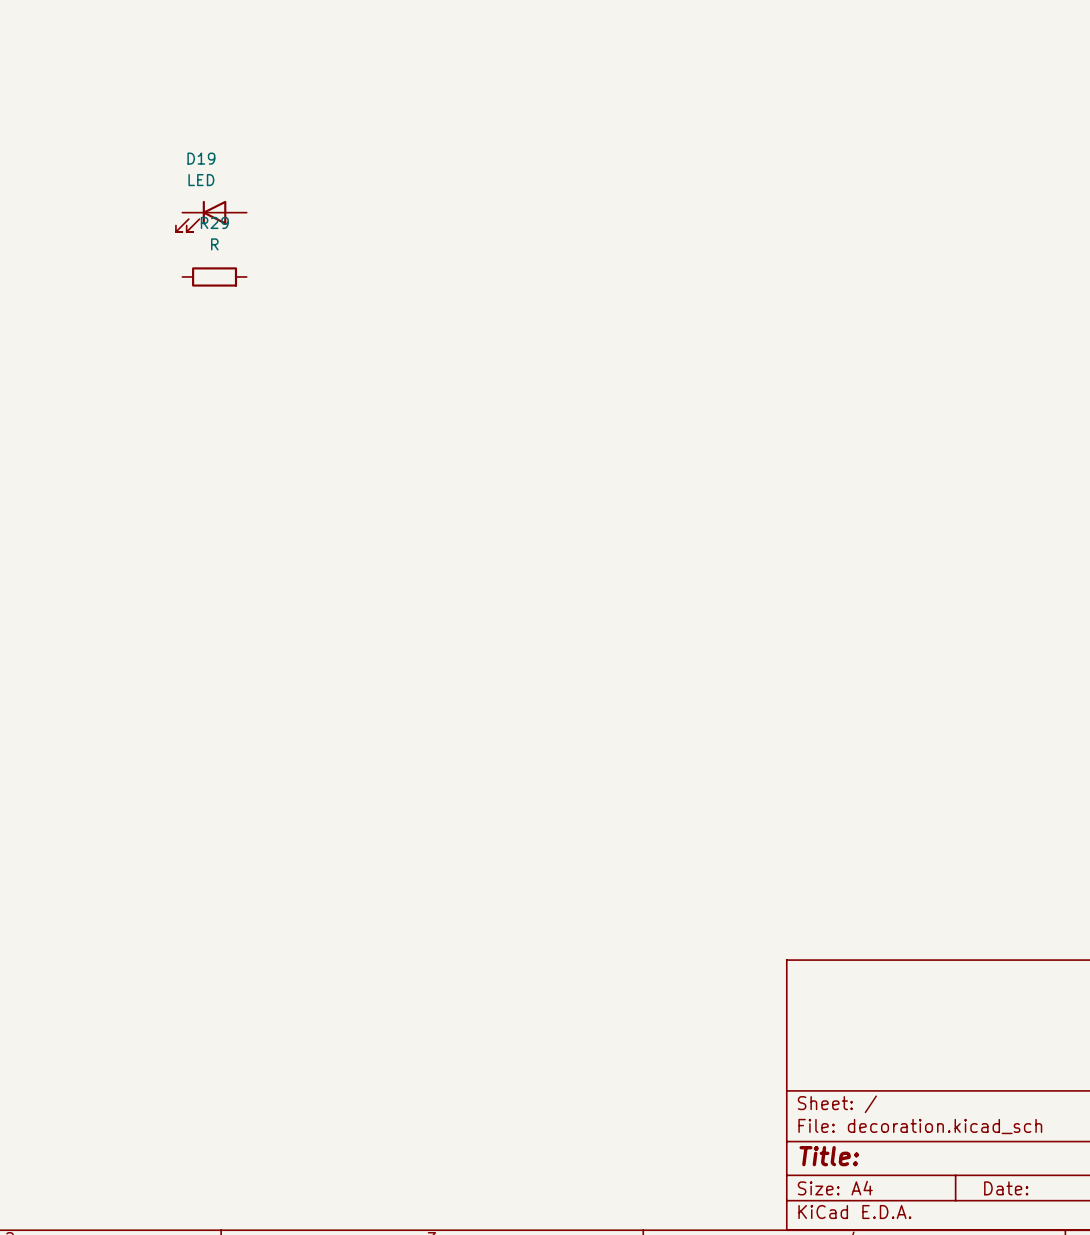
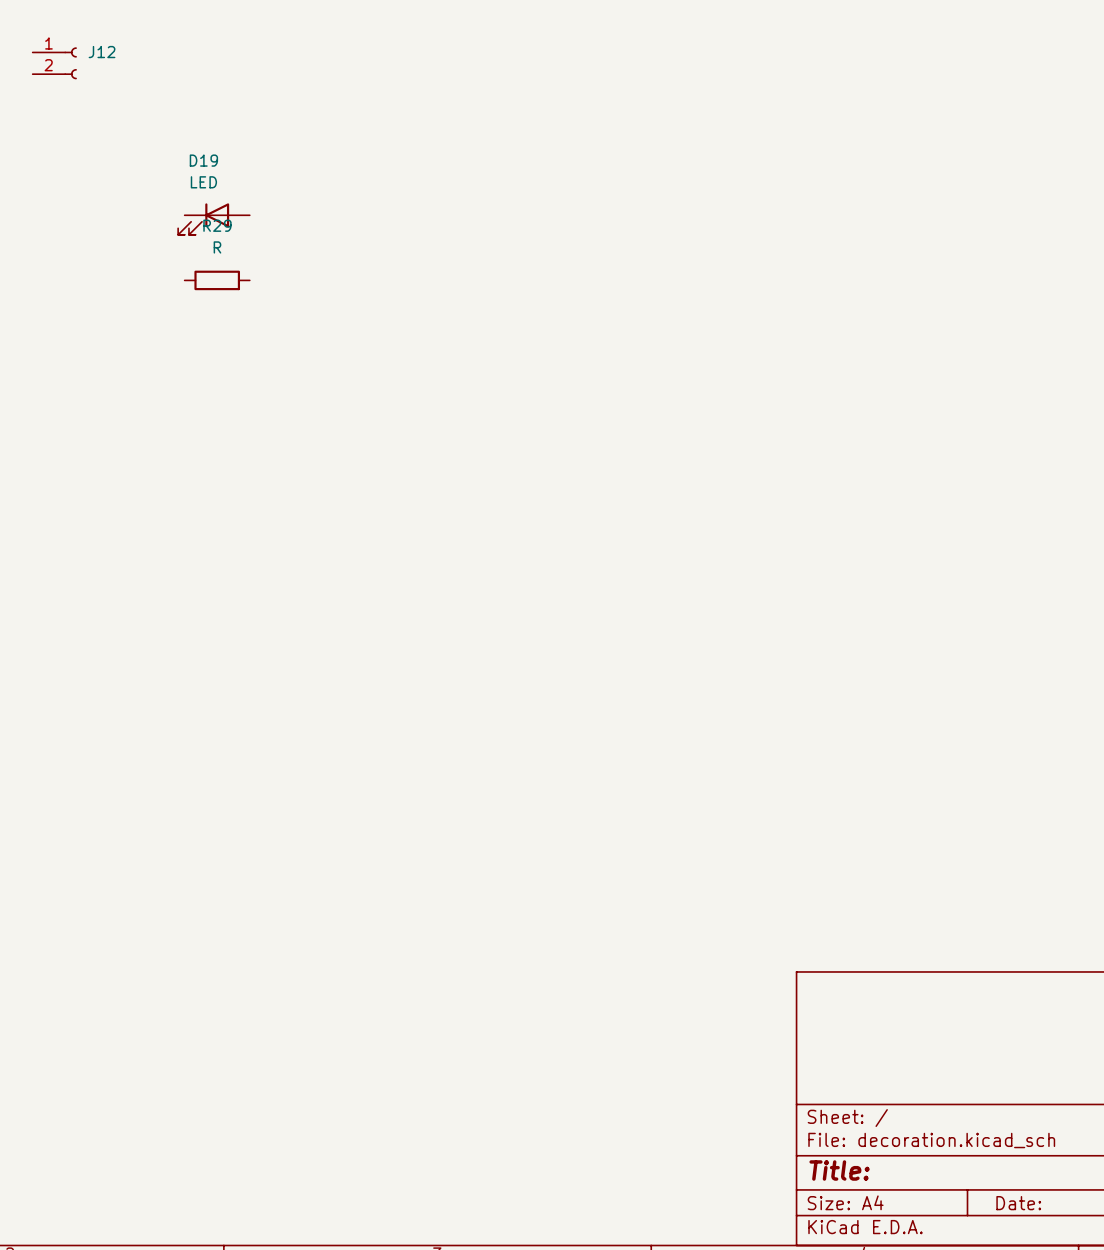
J12: none -> (54, 63)

